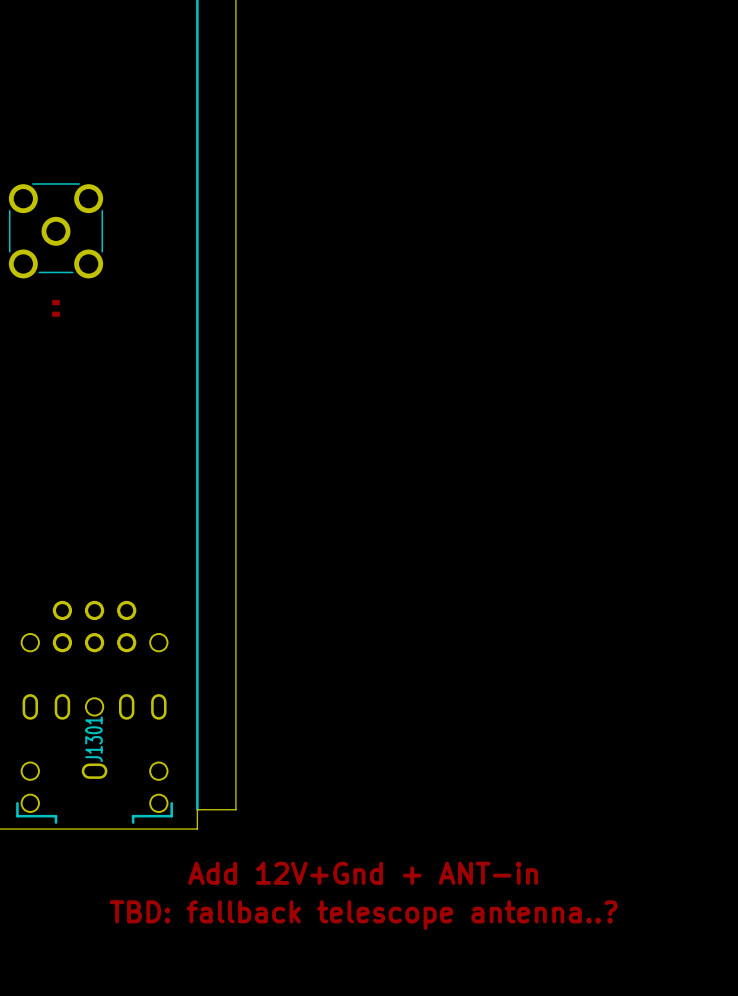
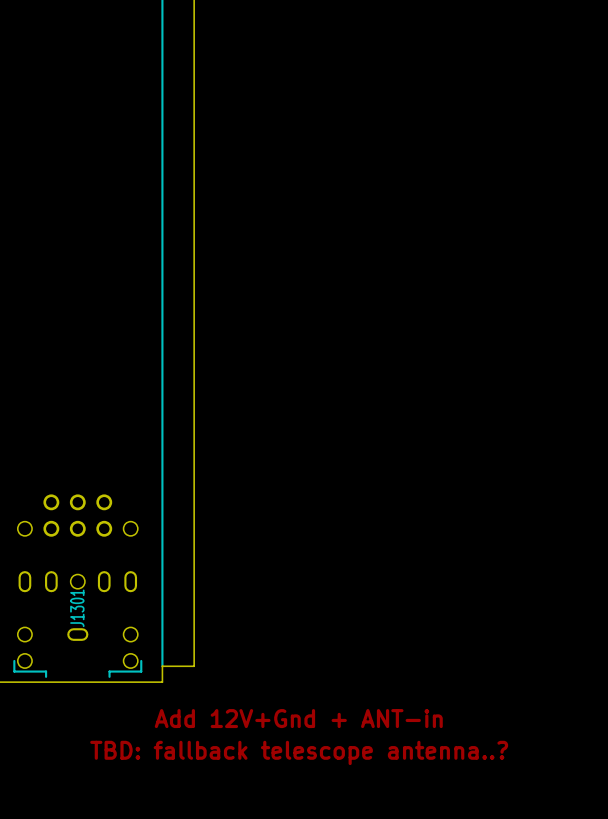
part: (56, 230) -> none
part: (56, 308) -> none

